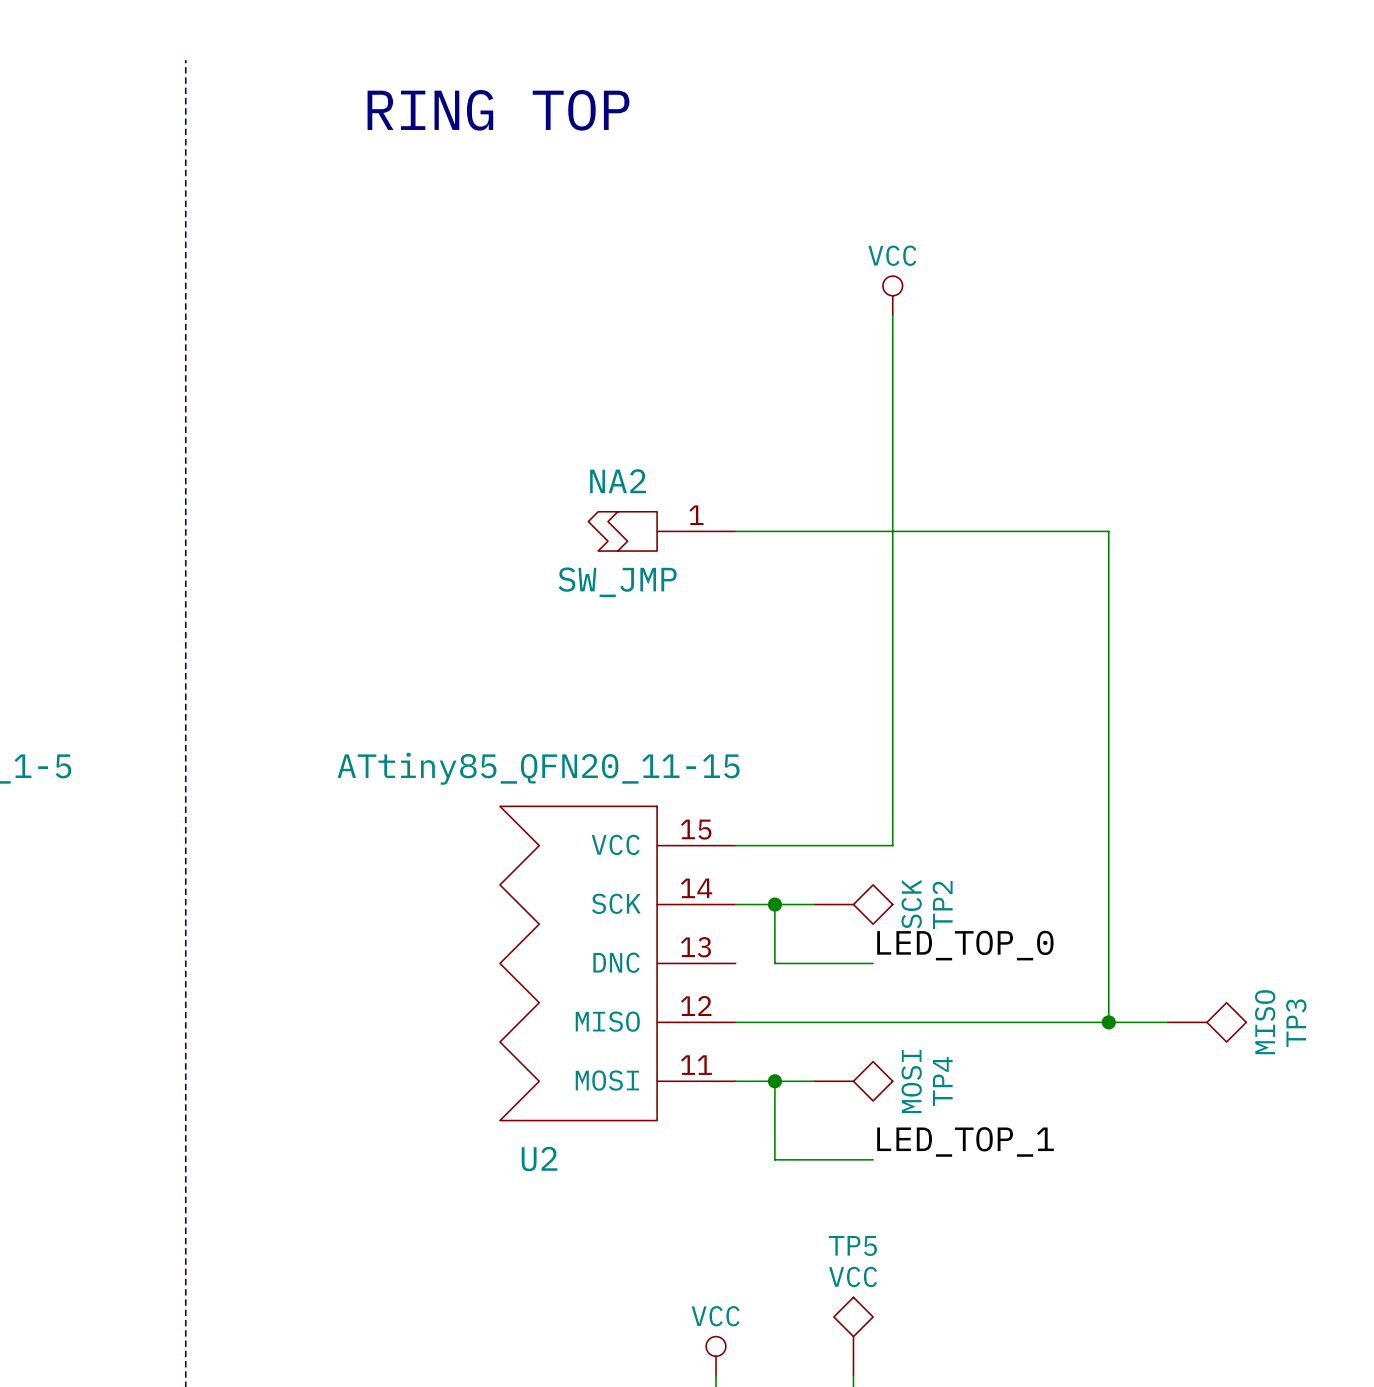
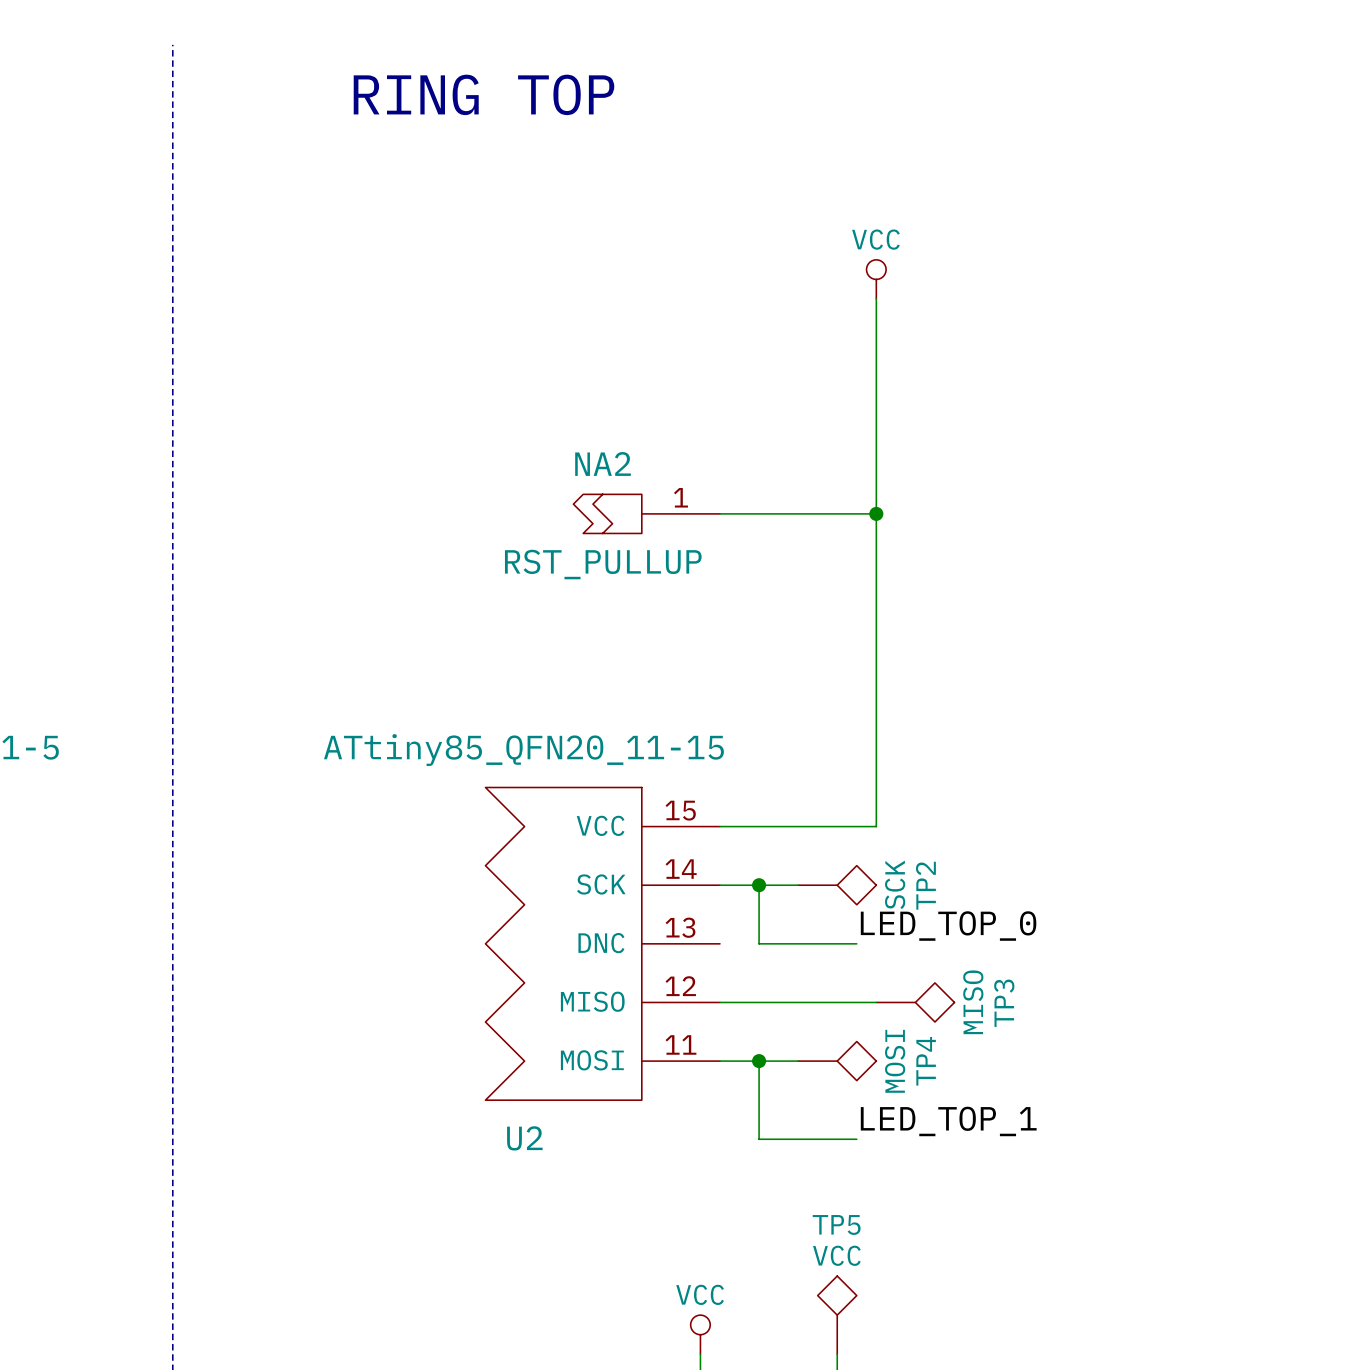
wire: (892, 531) (1108, 531) (1108, 1022) -> none
junction: none -> (876, 513)
NA2 value: SW_JMP (617, 582) -> RST_PULLUP (603, 564)
wire: (892, 1022) (1167, 1022) -> none
junction: (1108, 1022) -> none
TP3 position: (1206, 1022) -> (915, 1002)

